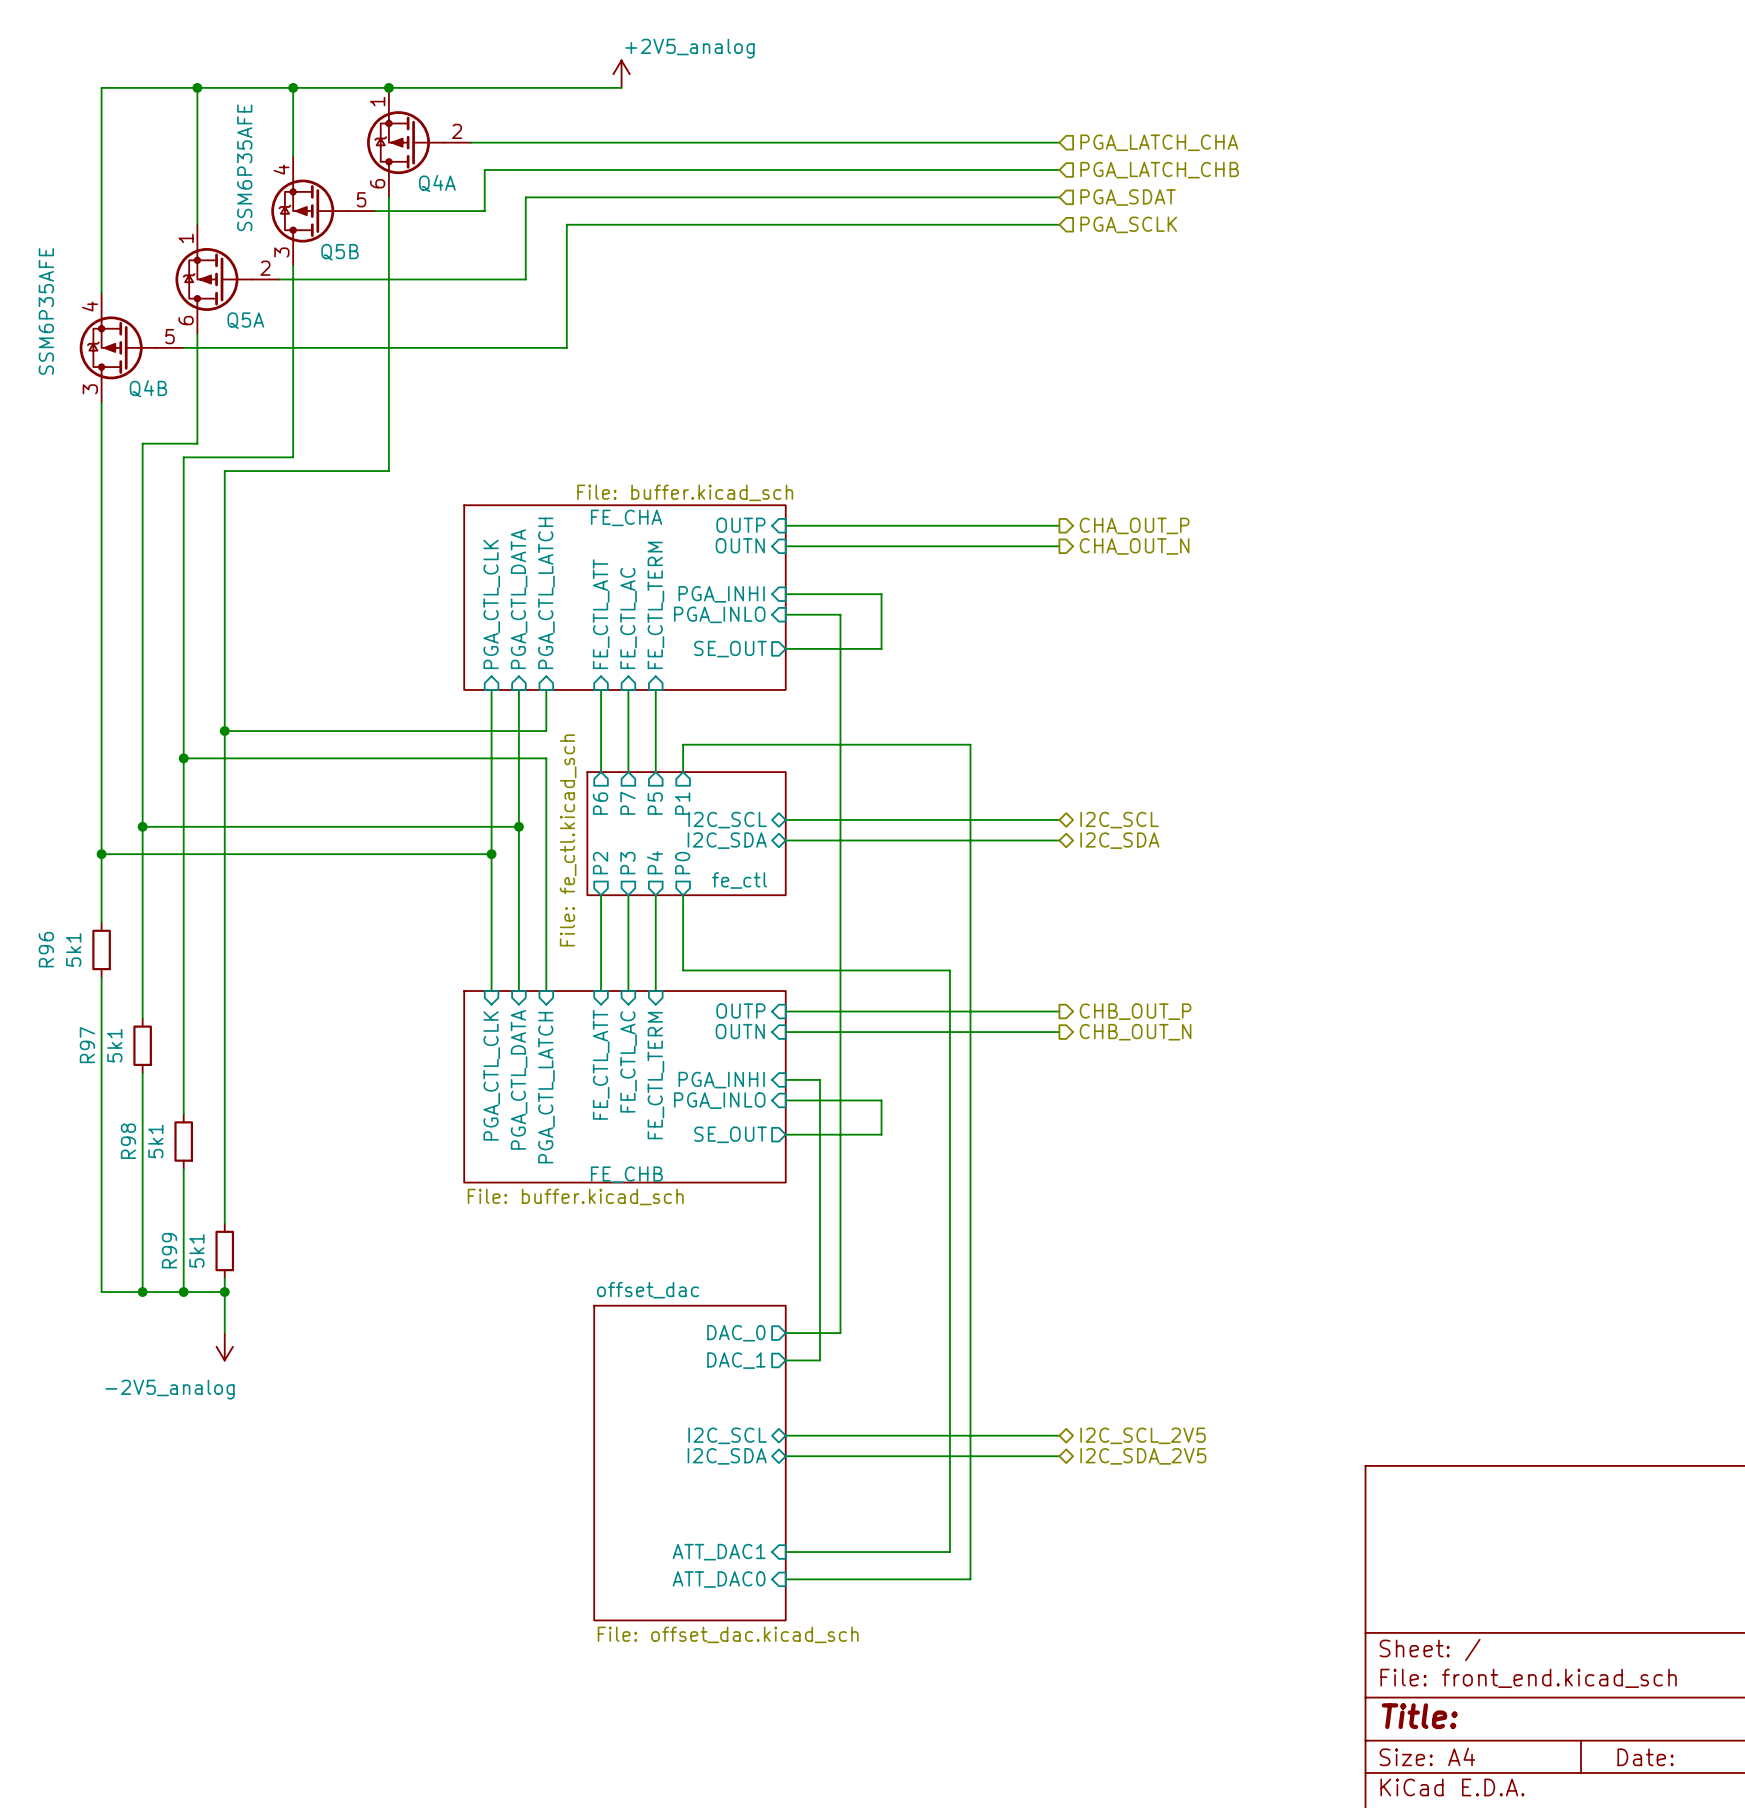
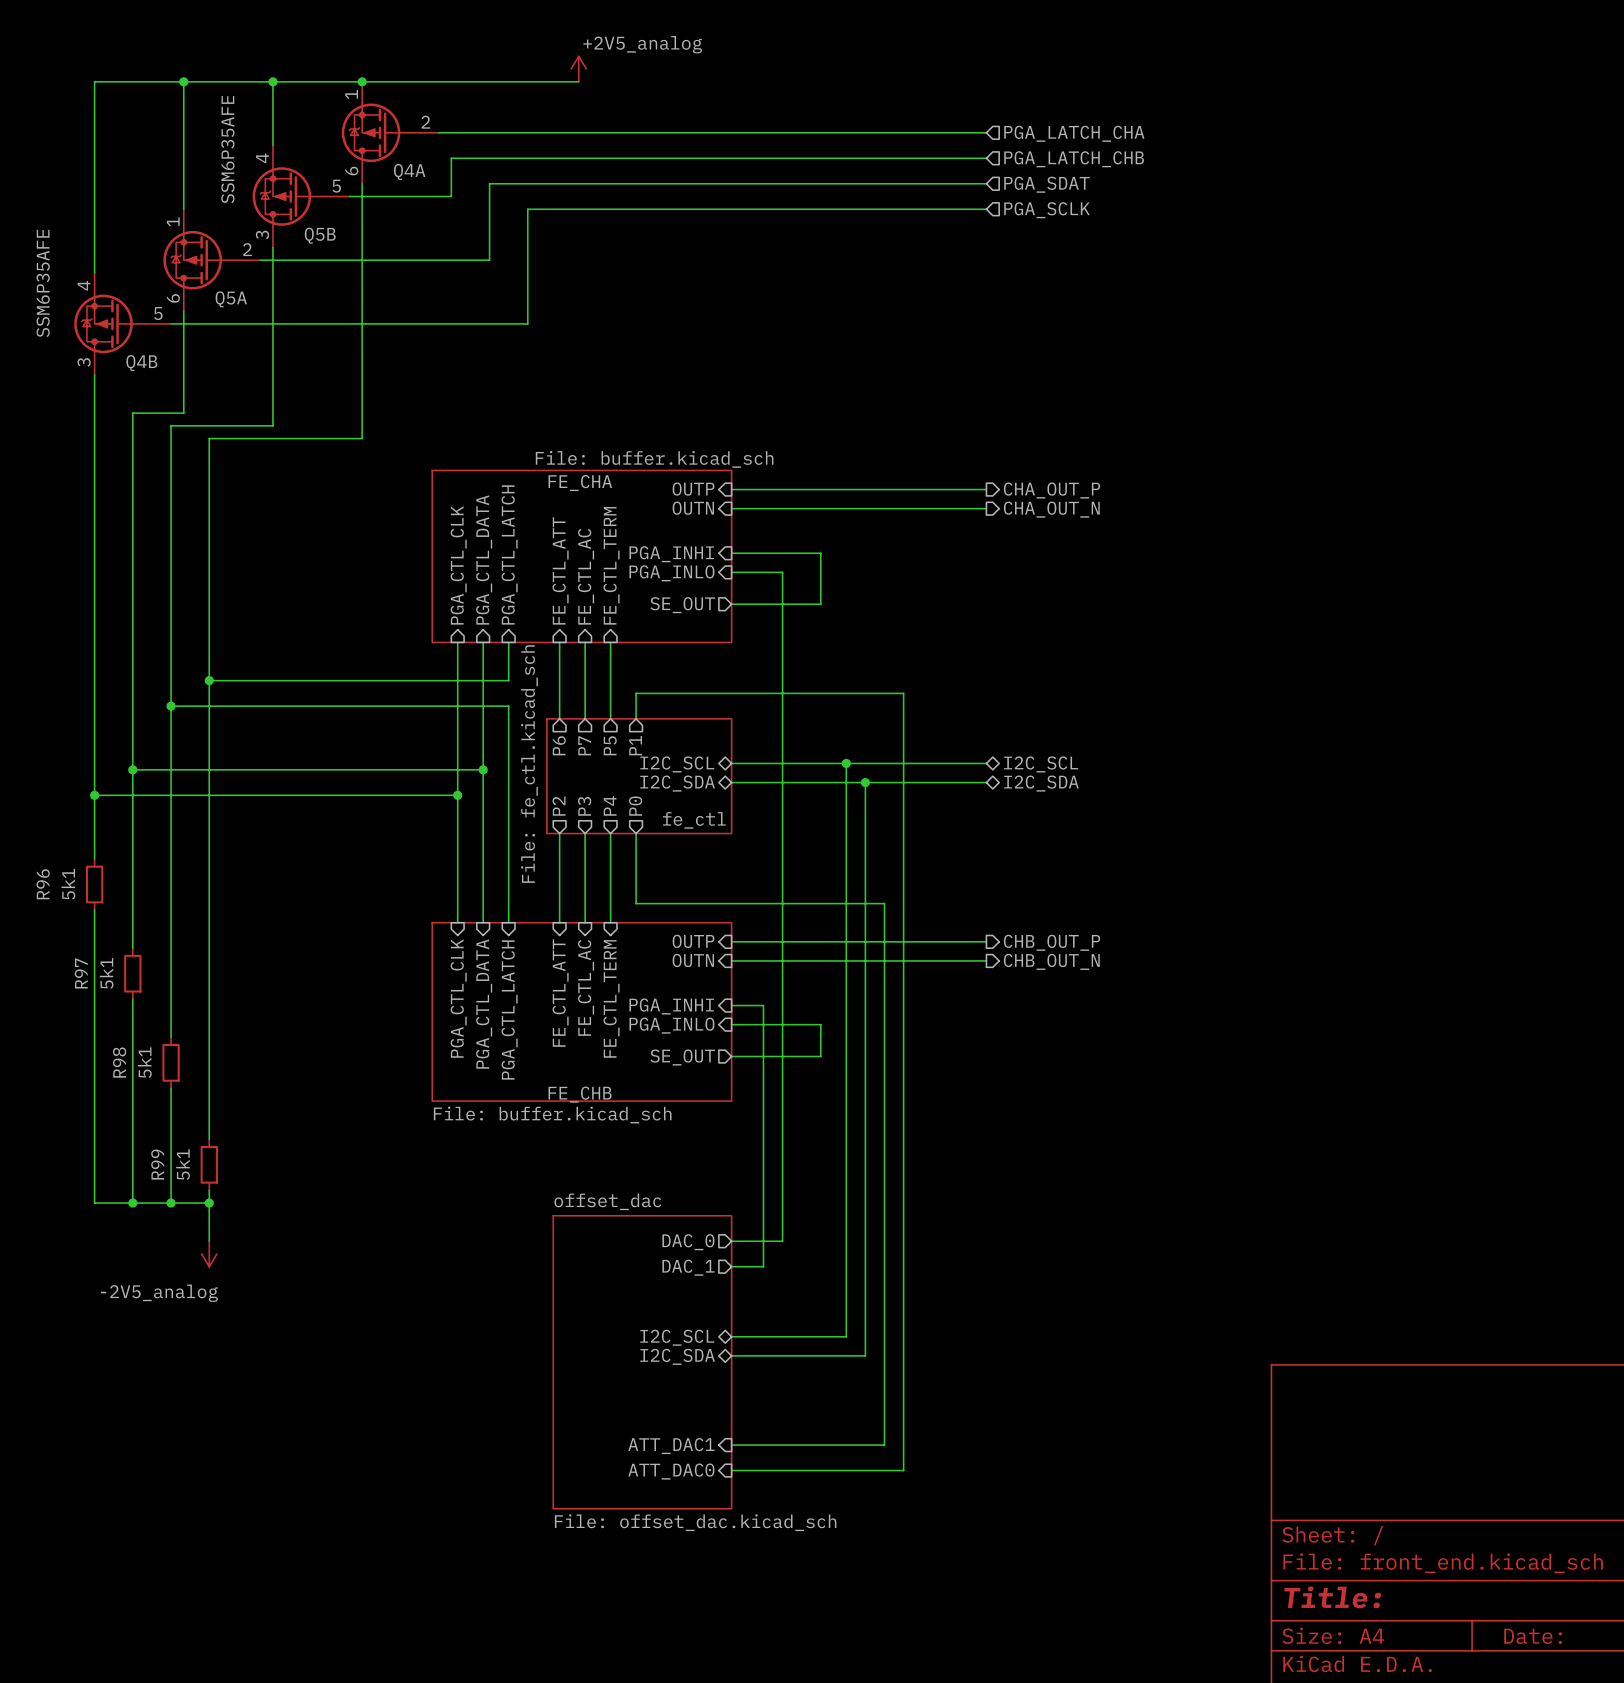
junction: none -> (846, 763)
junction: none -> (865, 782)
wire: (908, 1435) (1059, 1435) -> (846, 1336) (846, 763)
hierarchical label: I2C_SCL_2V5 (1143, 1435) -> none
wire: (929, 1456) (1059, 1456) -> (865, 1355) (865, 782)
hierarchical label: I2C_SDA_2V5 (1143, 1456) -> none

